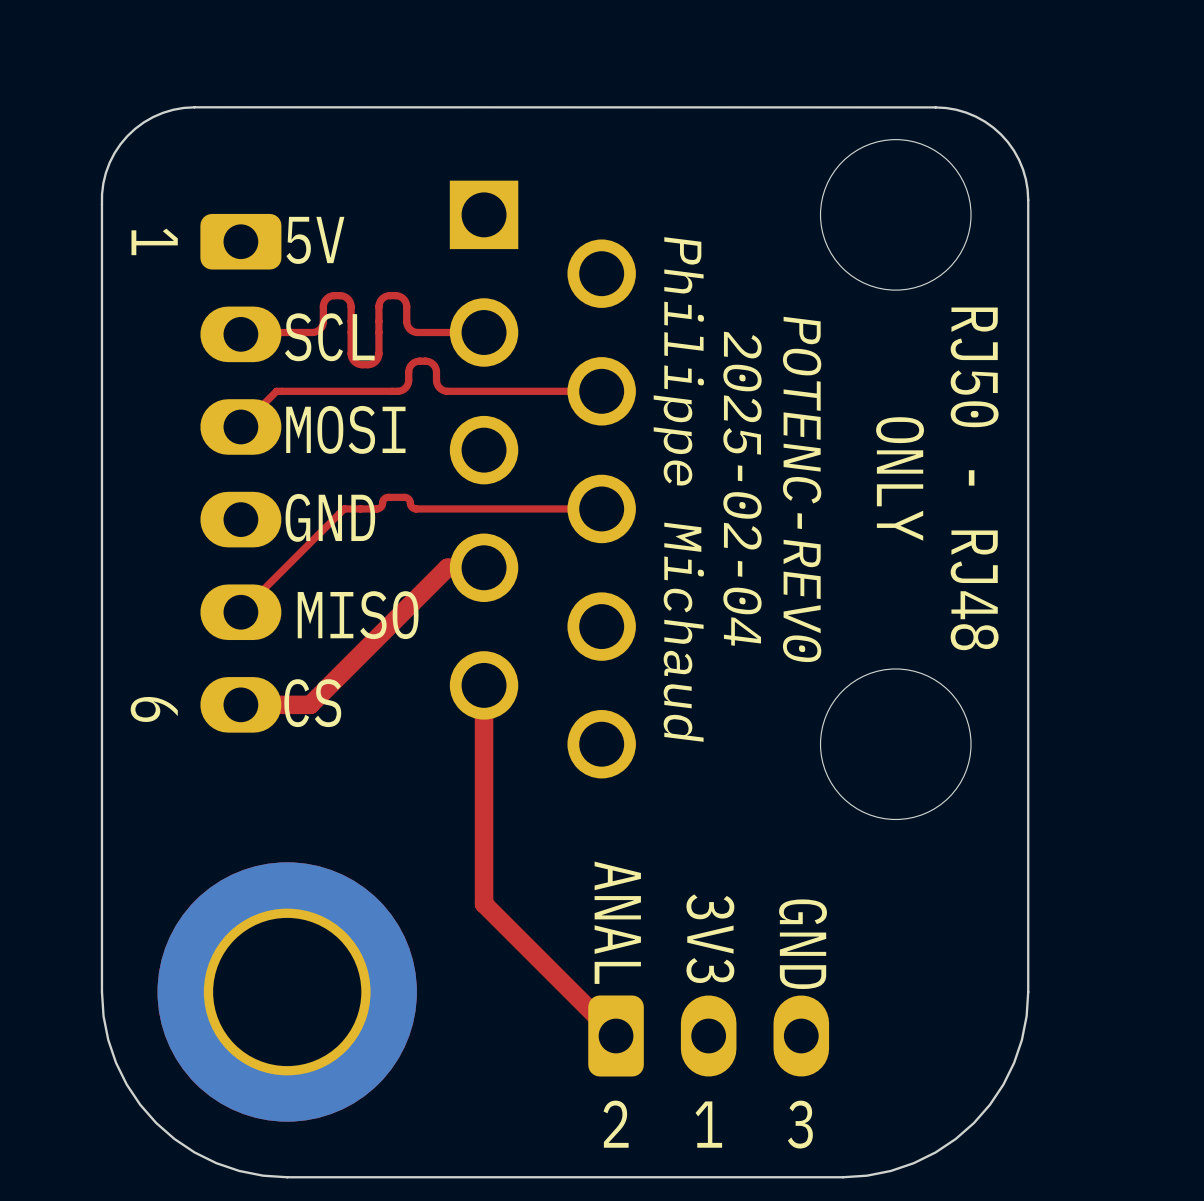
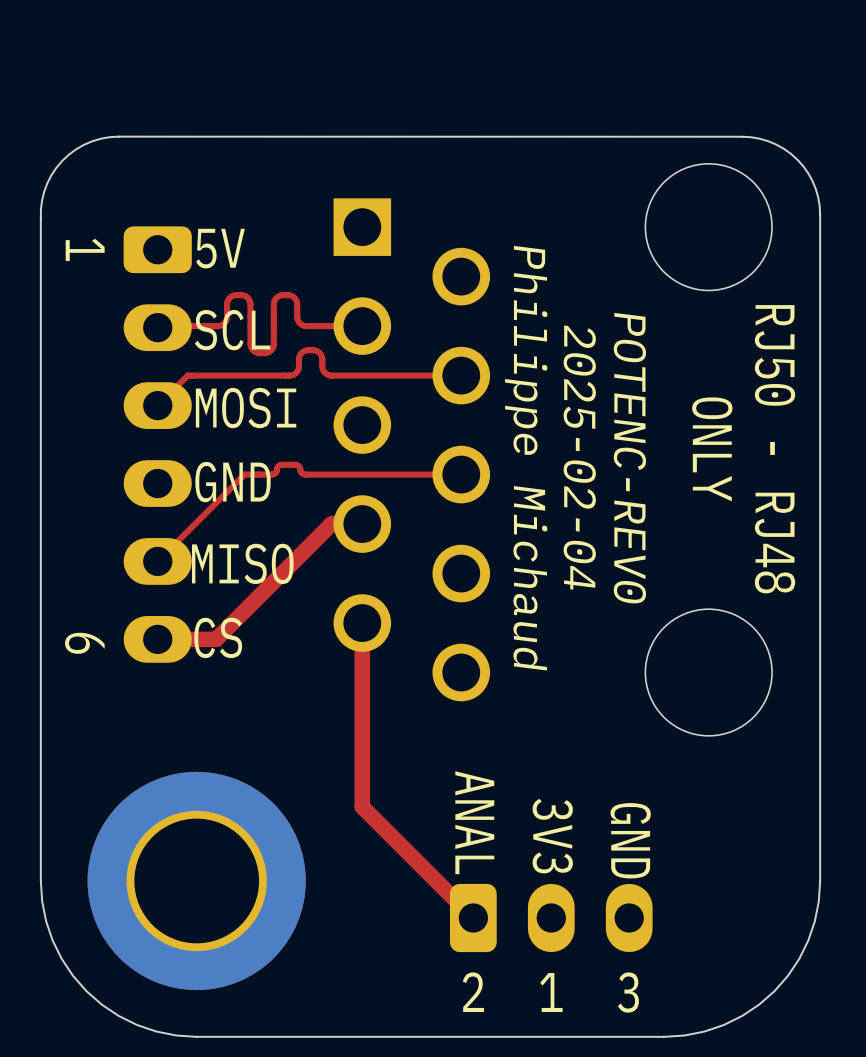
text position: MISO (358, 615) -> MISO (242, 563)

